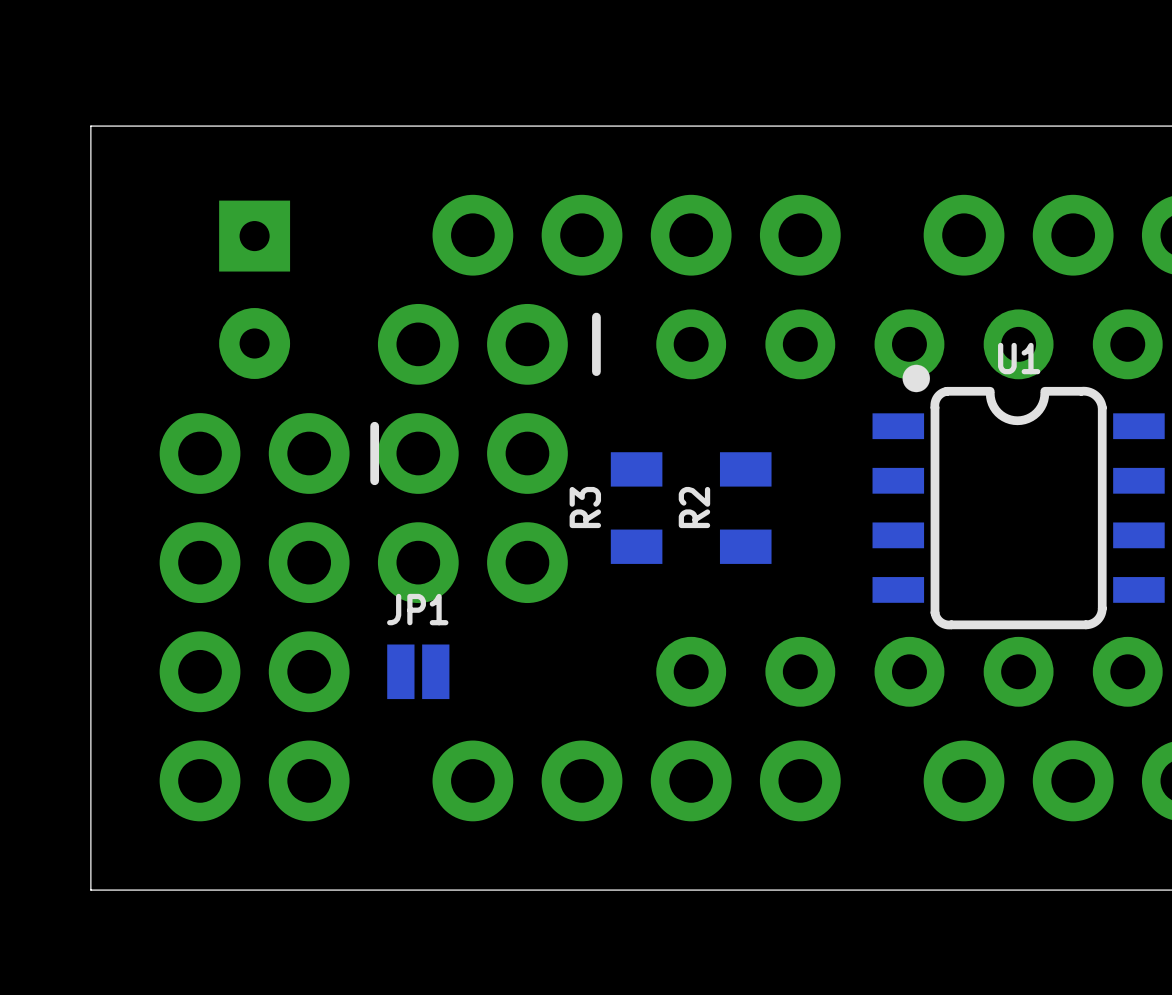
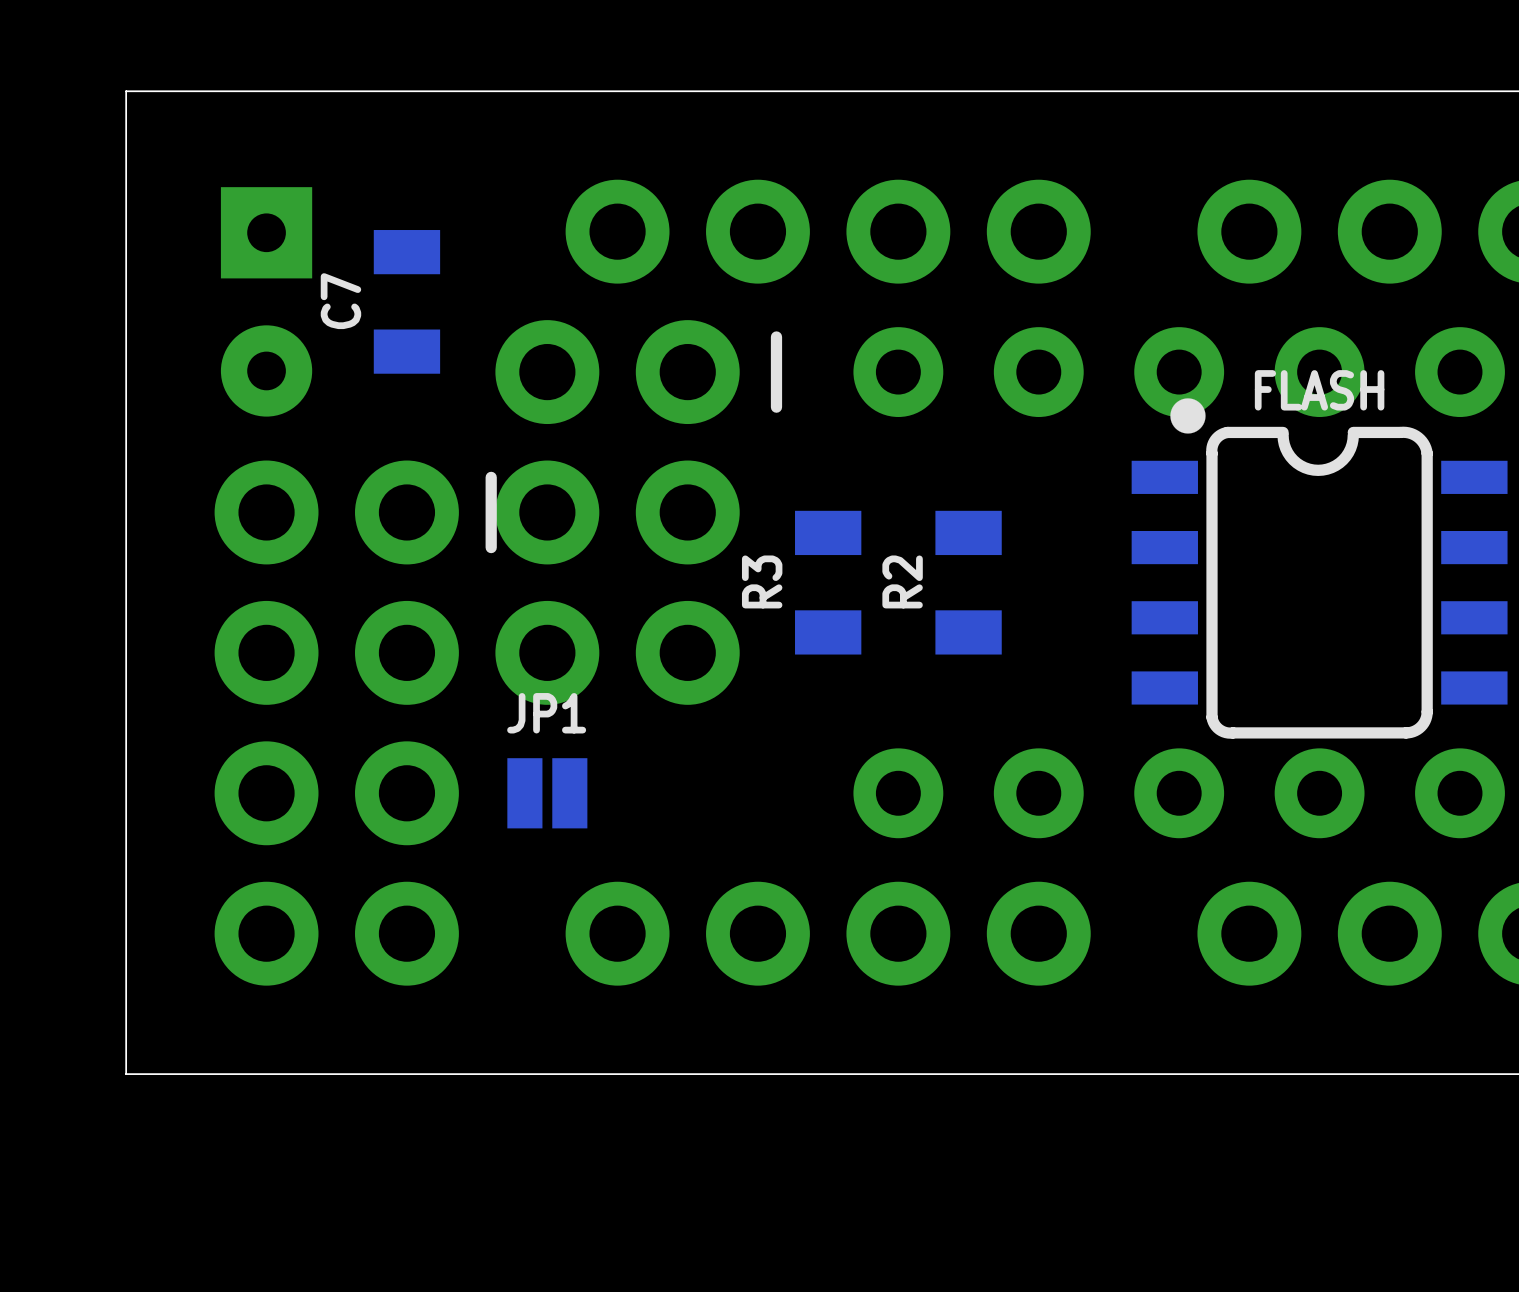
part position: (254, 289) -> (266, 301)
C7: none -> (406, 301)
U1 name: U1 (1019, 358) -> FLASH (1319, 390)

